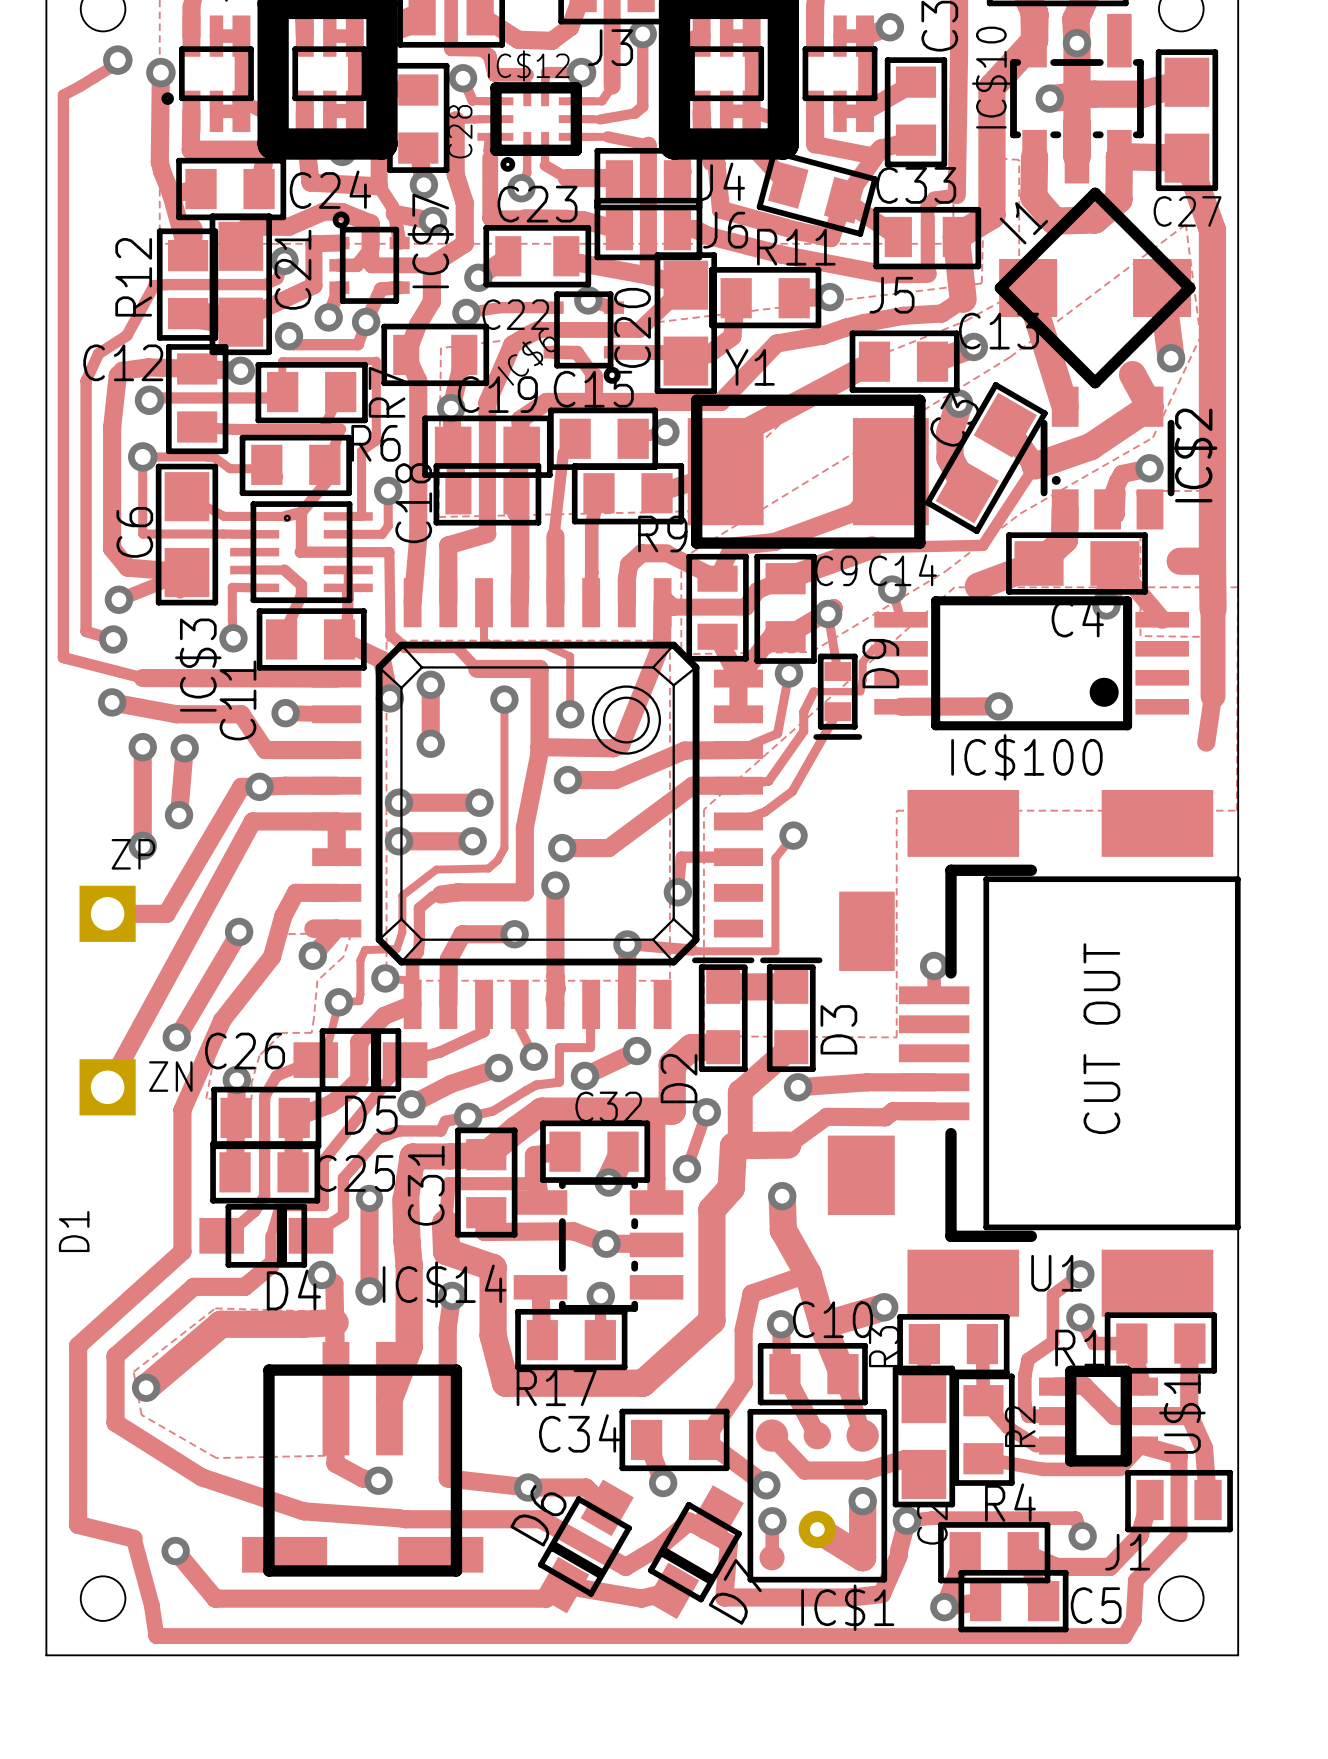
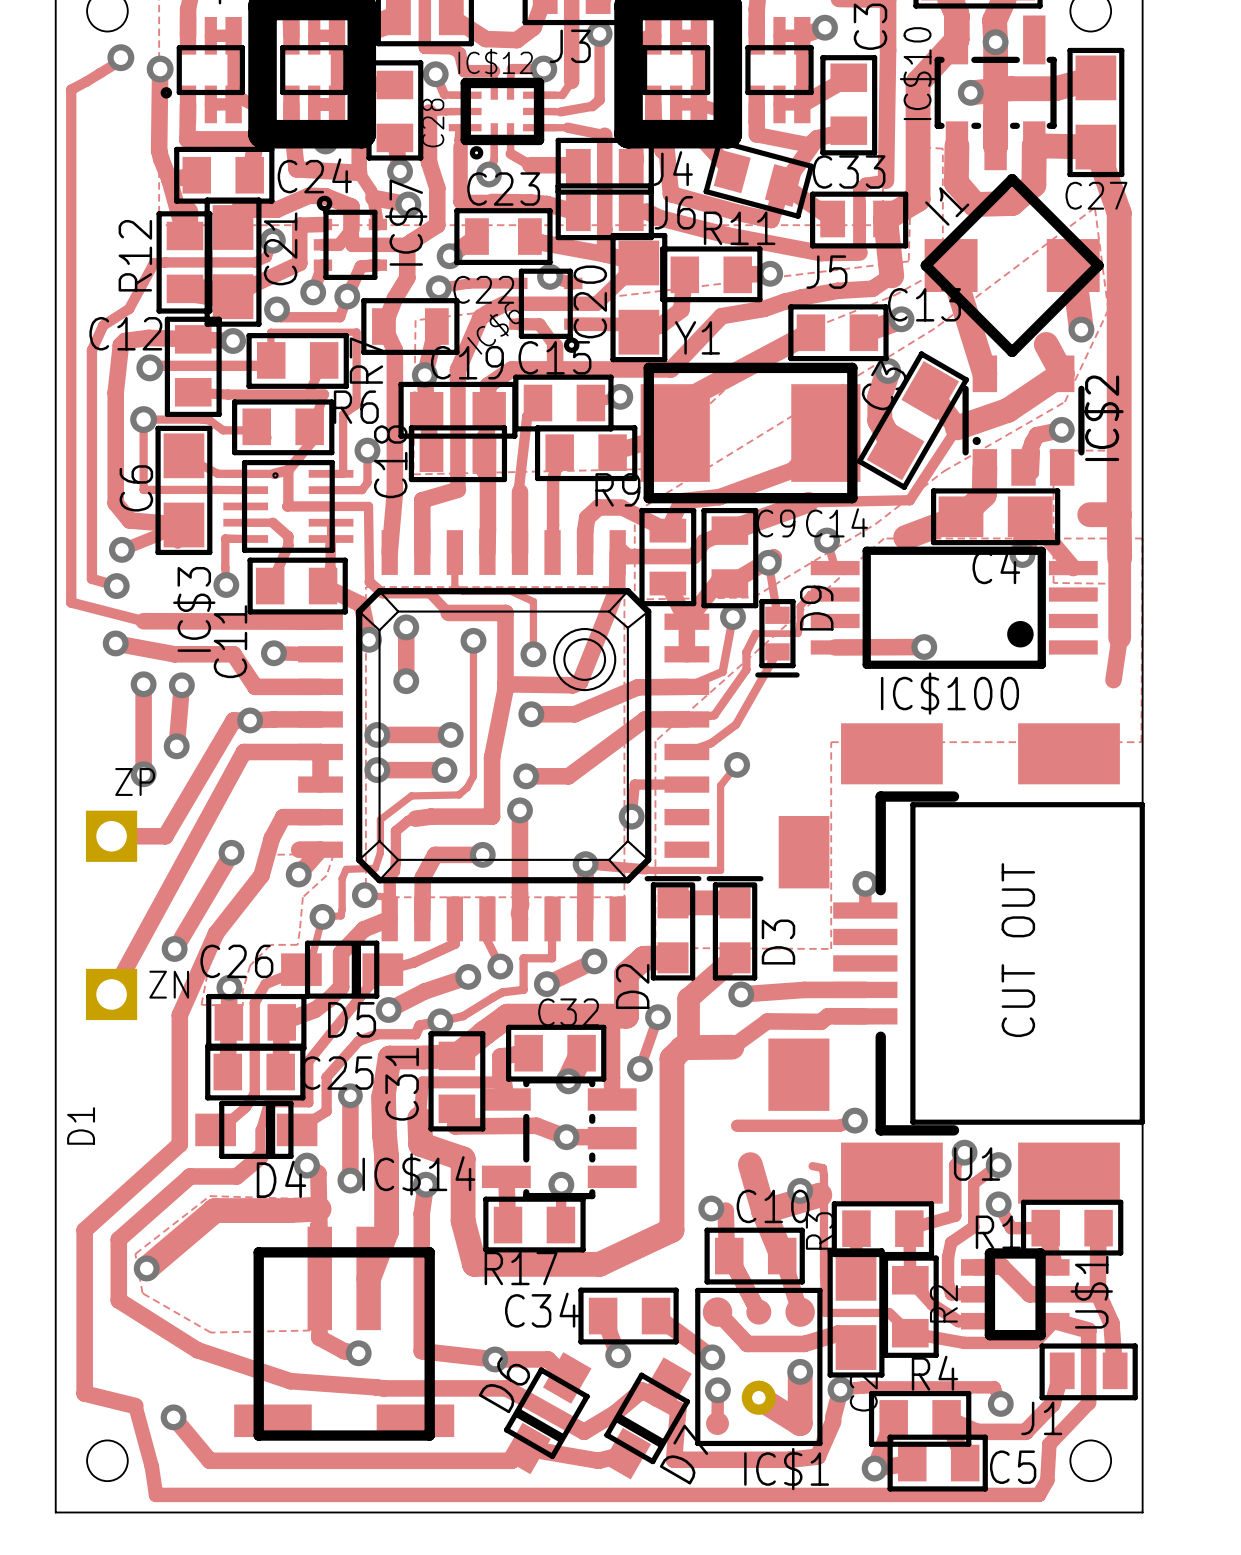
track: (733, 1146) (731, 1188) (711, 1209) (711, 1320) (642, 1383) -> (682, 1048) (671, 1058) (671, 1230) (599, 1264)
track: (782, 1196) (783, 1230) (808, 1273) (751, 1293) (743, 1329) (743, 1383) (704, 1439) -> none
via: (782, 1196) -> none
track: none -> (854, 1120) (839, 1125) (737, 1125)
via: none -> (854, 1120)
track: none -> (964, 1152) (955, 1165) (955, 1215) (909, 1228)
via: none -> (964, 1152)
track: none -> (812, 1166) (822, 1168) (823, 1175) (825, 1312) (889, 1312) (910, 1333)
via position: (884, 1307) -> (800, 1190)
via position: (781, 1324) -> (711, 1208)

